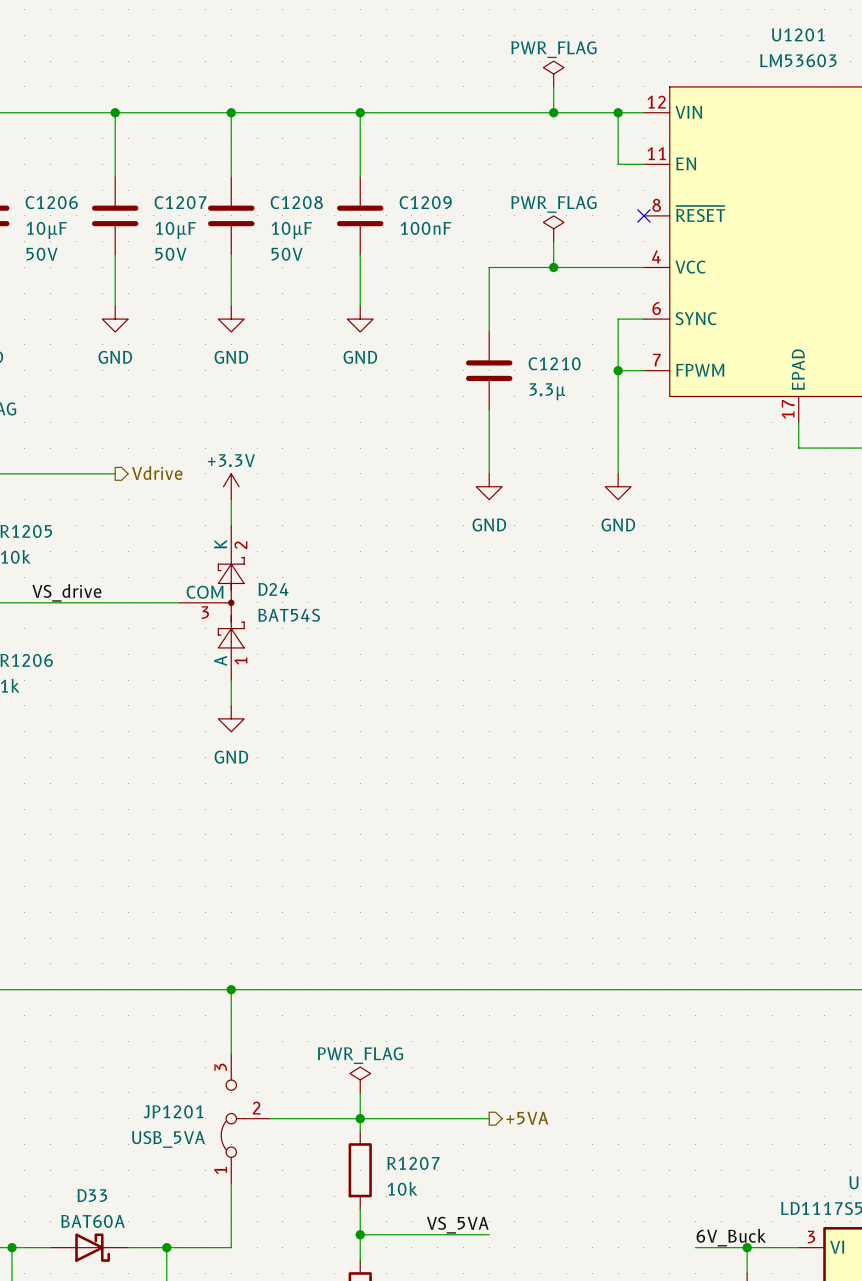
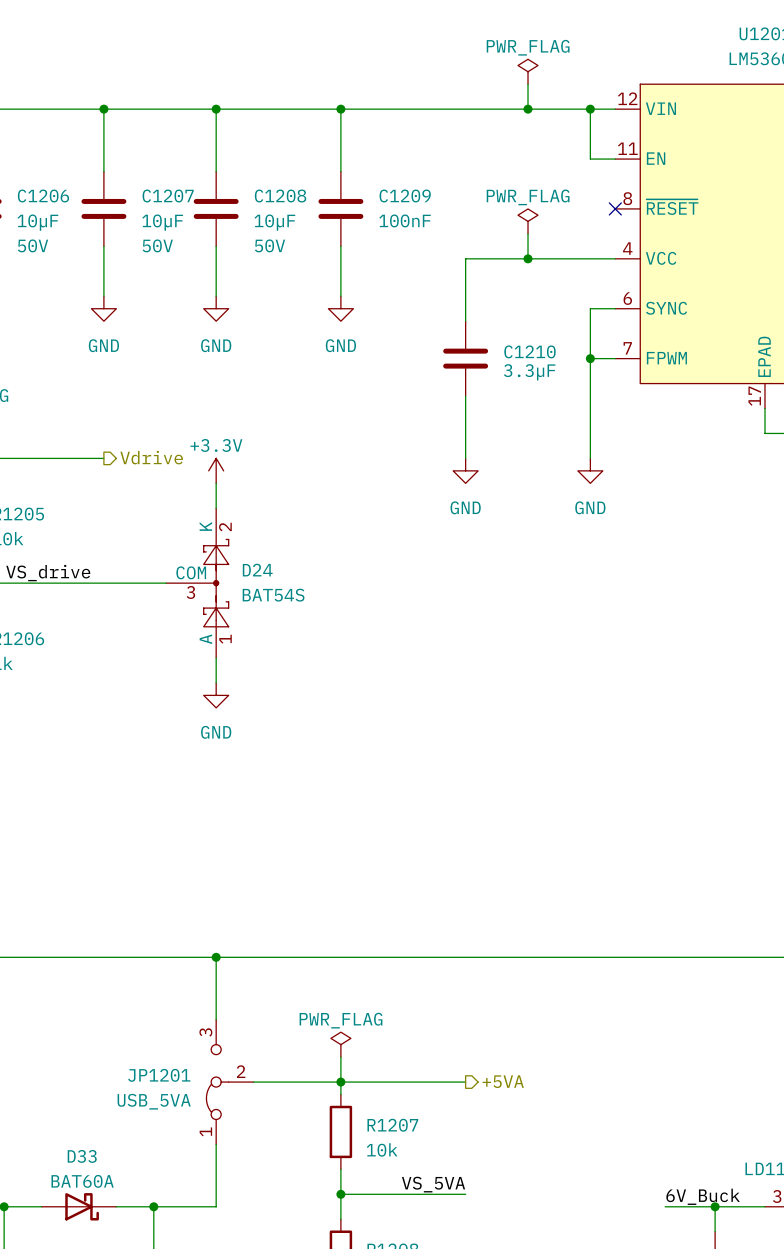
C1210 value: 3.3µ (547, 391) -> 3.3µF (529, 372)

